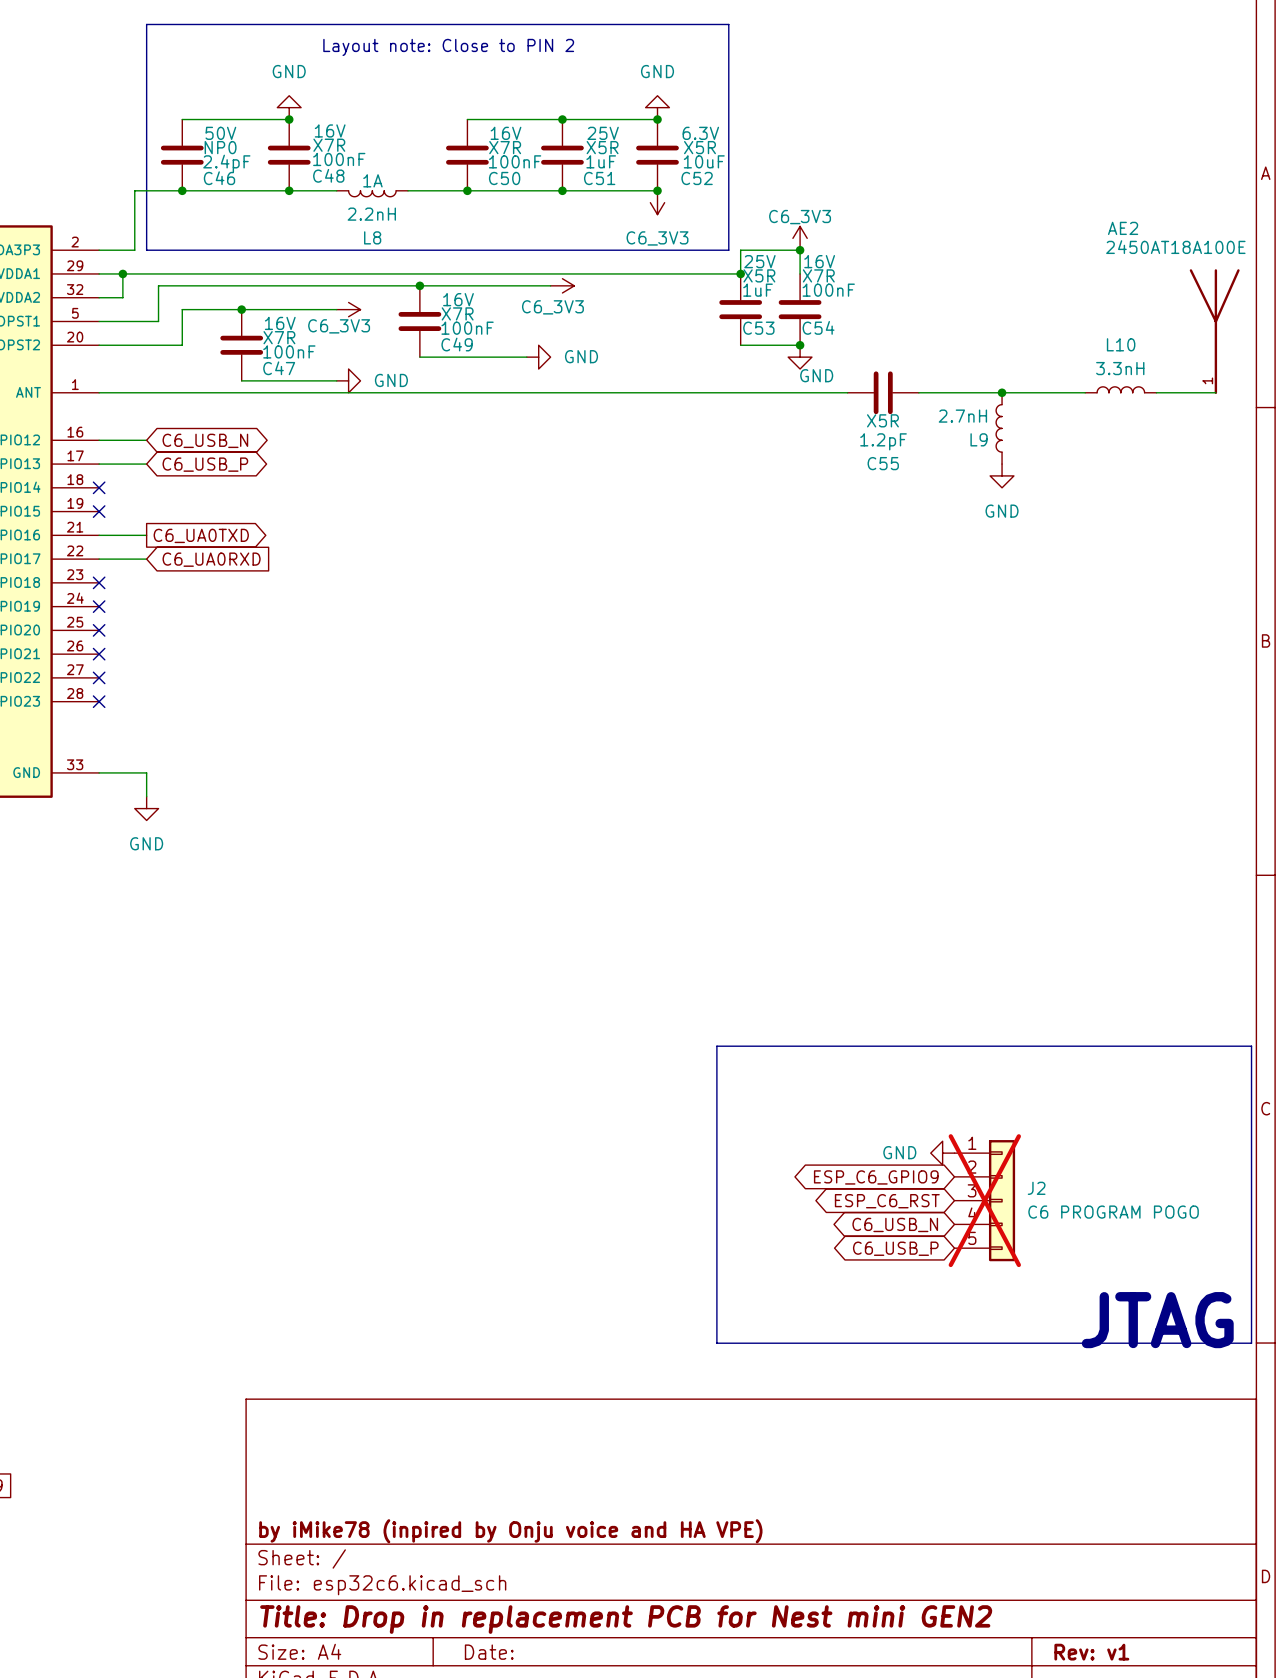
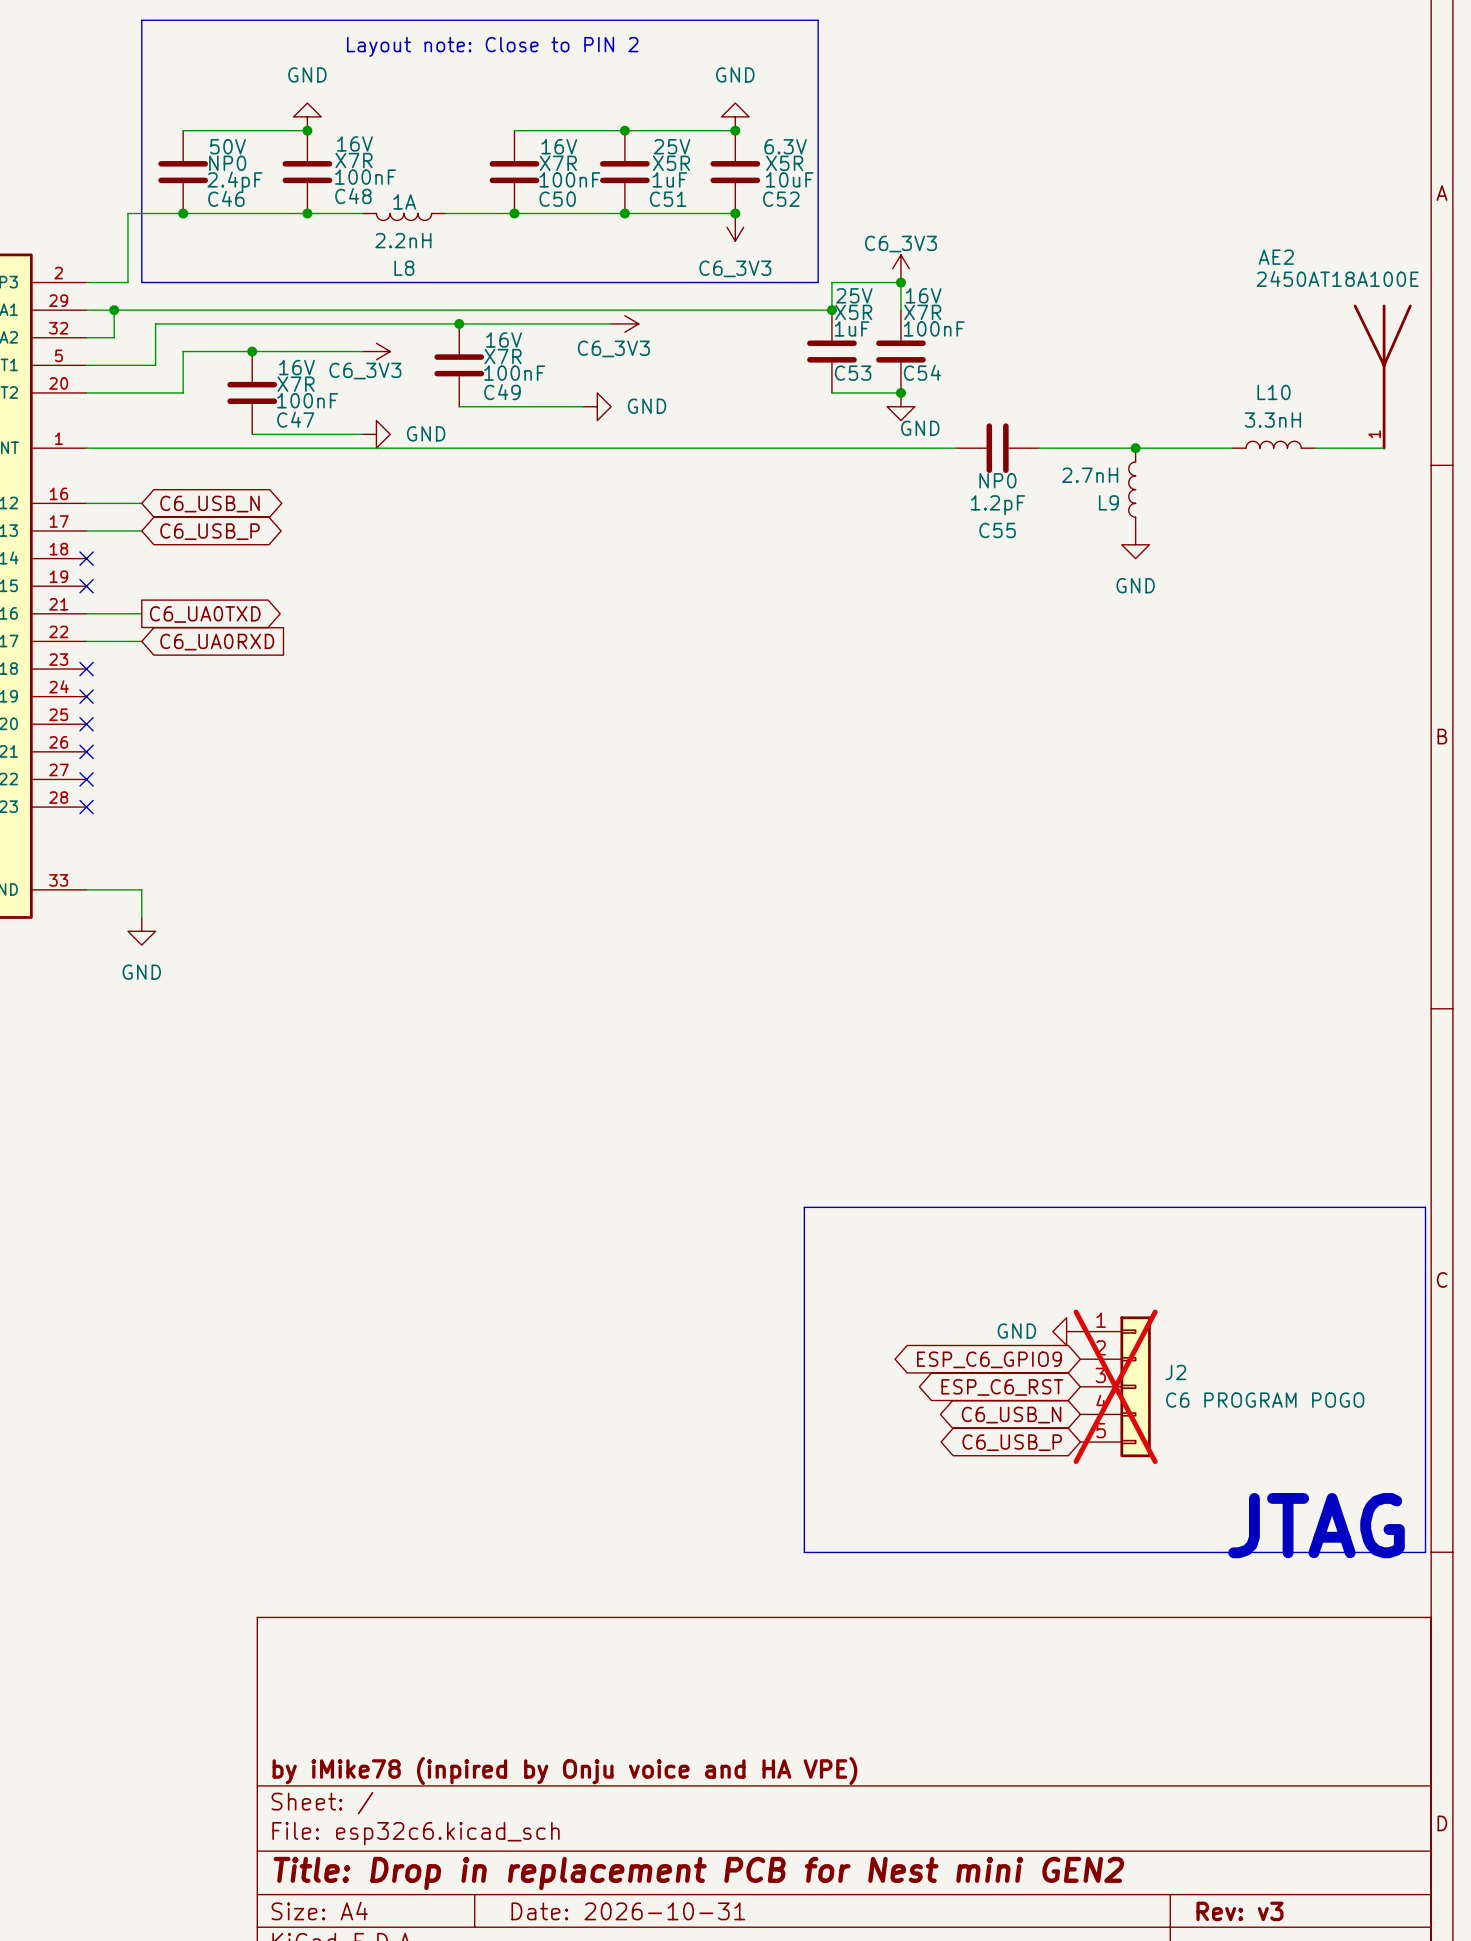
C55 text: X5R (882, 420) -> NP0 (997, 480)
title block: Date: (489, 1652) -> Date: 2026-10-31 (628, 1911)
title block: Rev: v1 (1091, 1652) -> Rev: v3 (1239, 1911)

